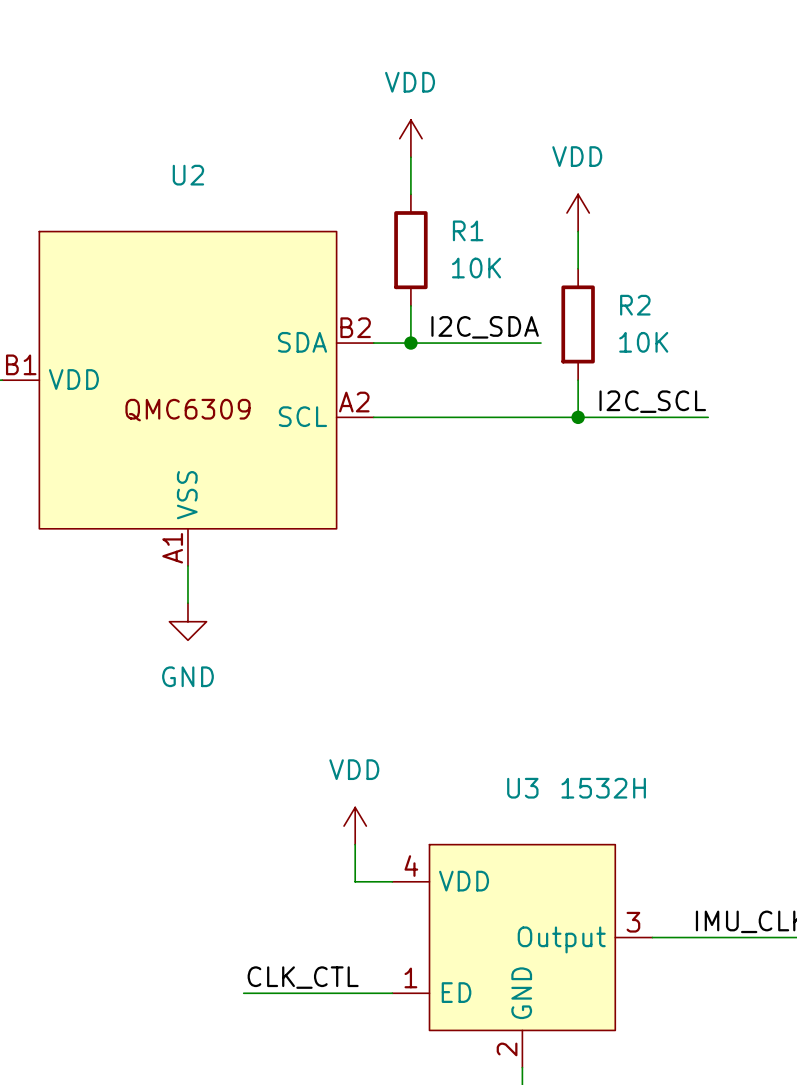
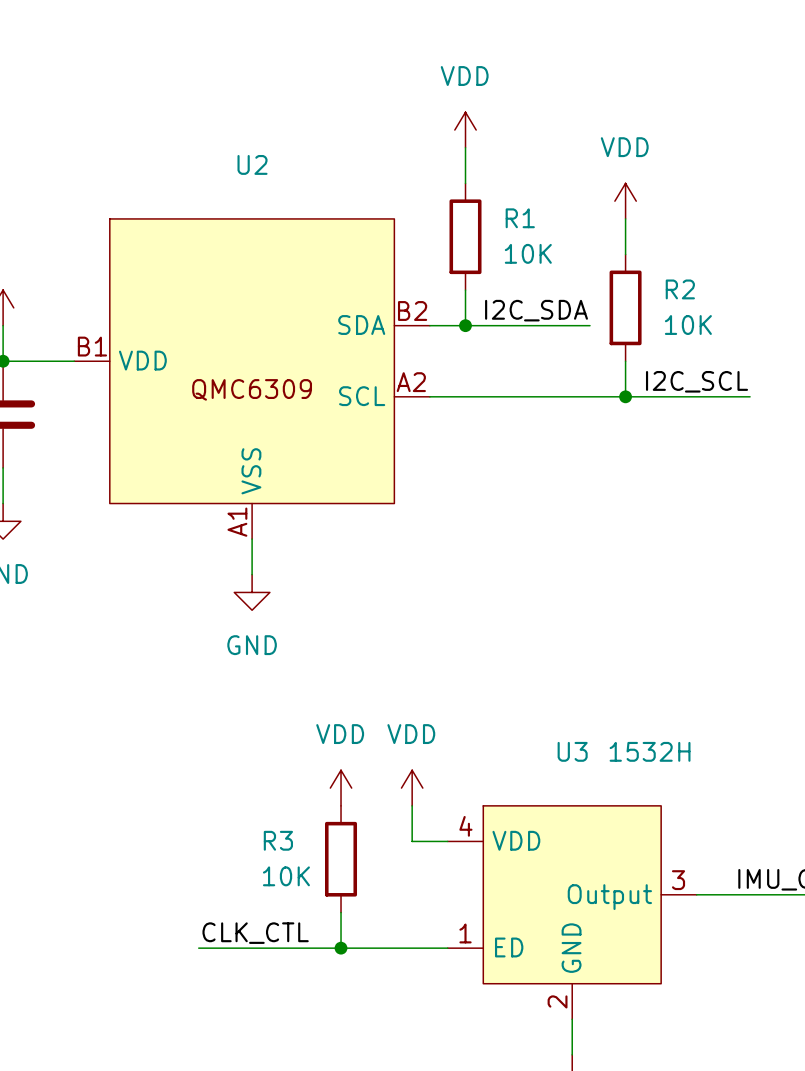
power symbol: none -> VDD (341, 788)
R3: none -> 10K (341, 859)
wire: none -> (341, 912) (341, 948)
label position: CLK_CTL (303, 977) -> CLK_CTL (255, 933)
wire: none -> (198, 948) (305, 948)
junction: none -> (341, 948)

